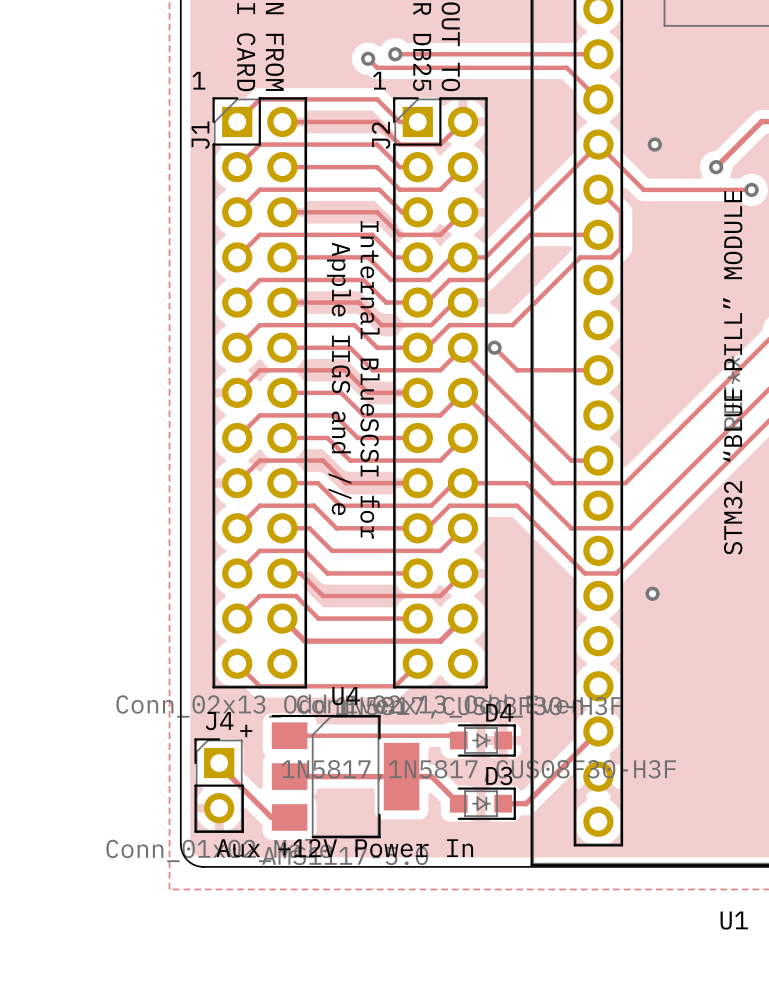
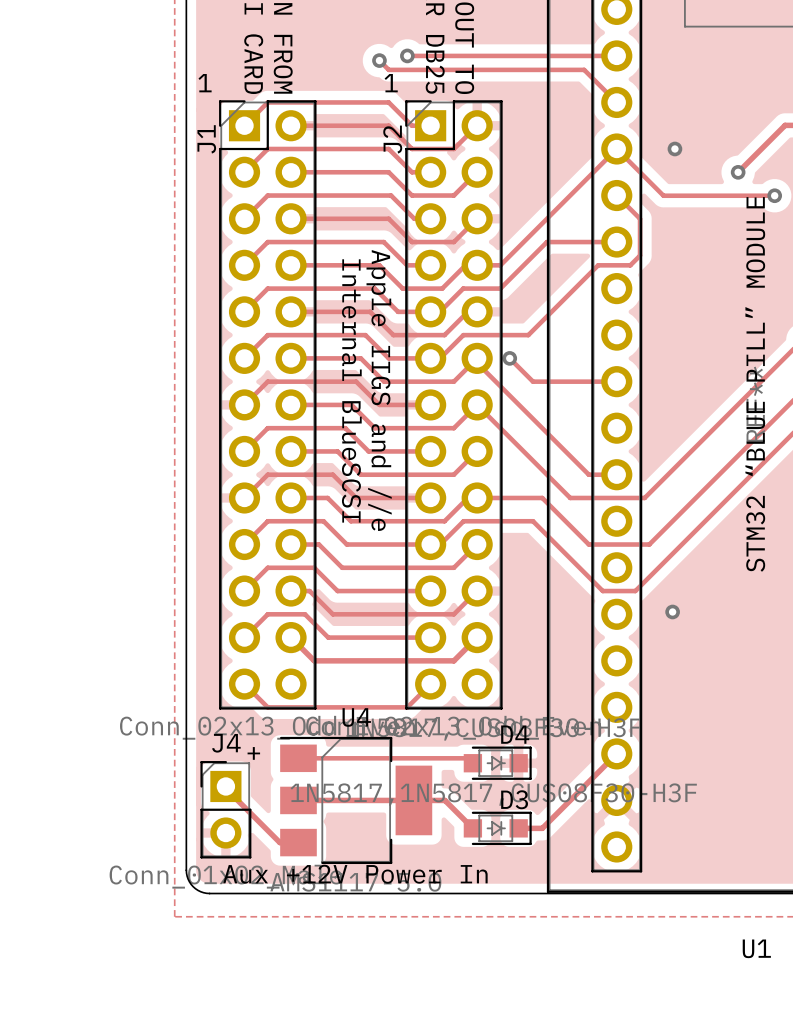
text: Apple IIGS and //e (339, 378) -> Internal BlueSCSI (351, 390)
text: Internal BlueSCSI for (369, 379) -> Apple IIGS and //e (379, 390)

